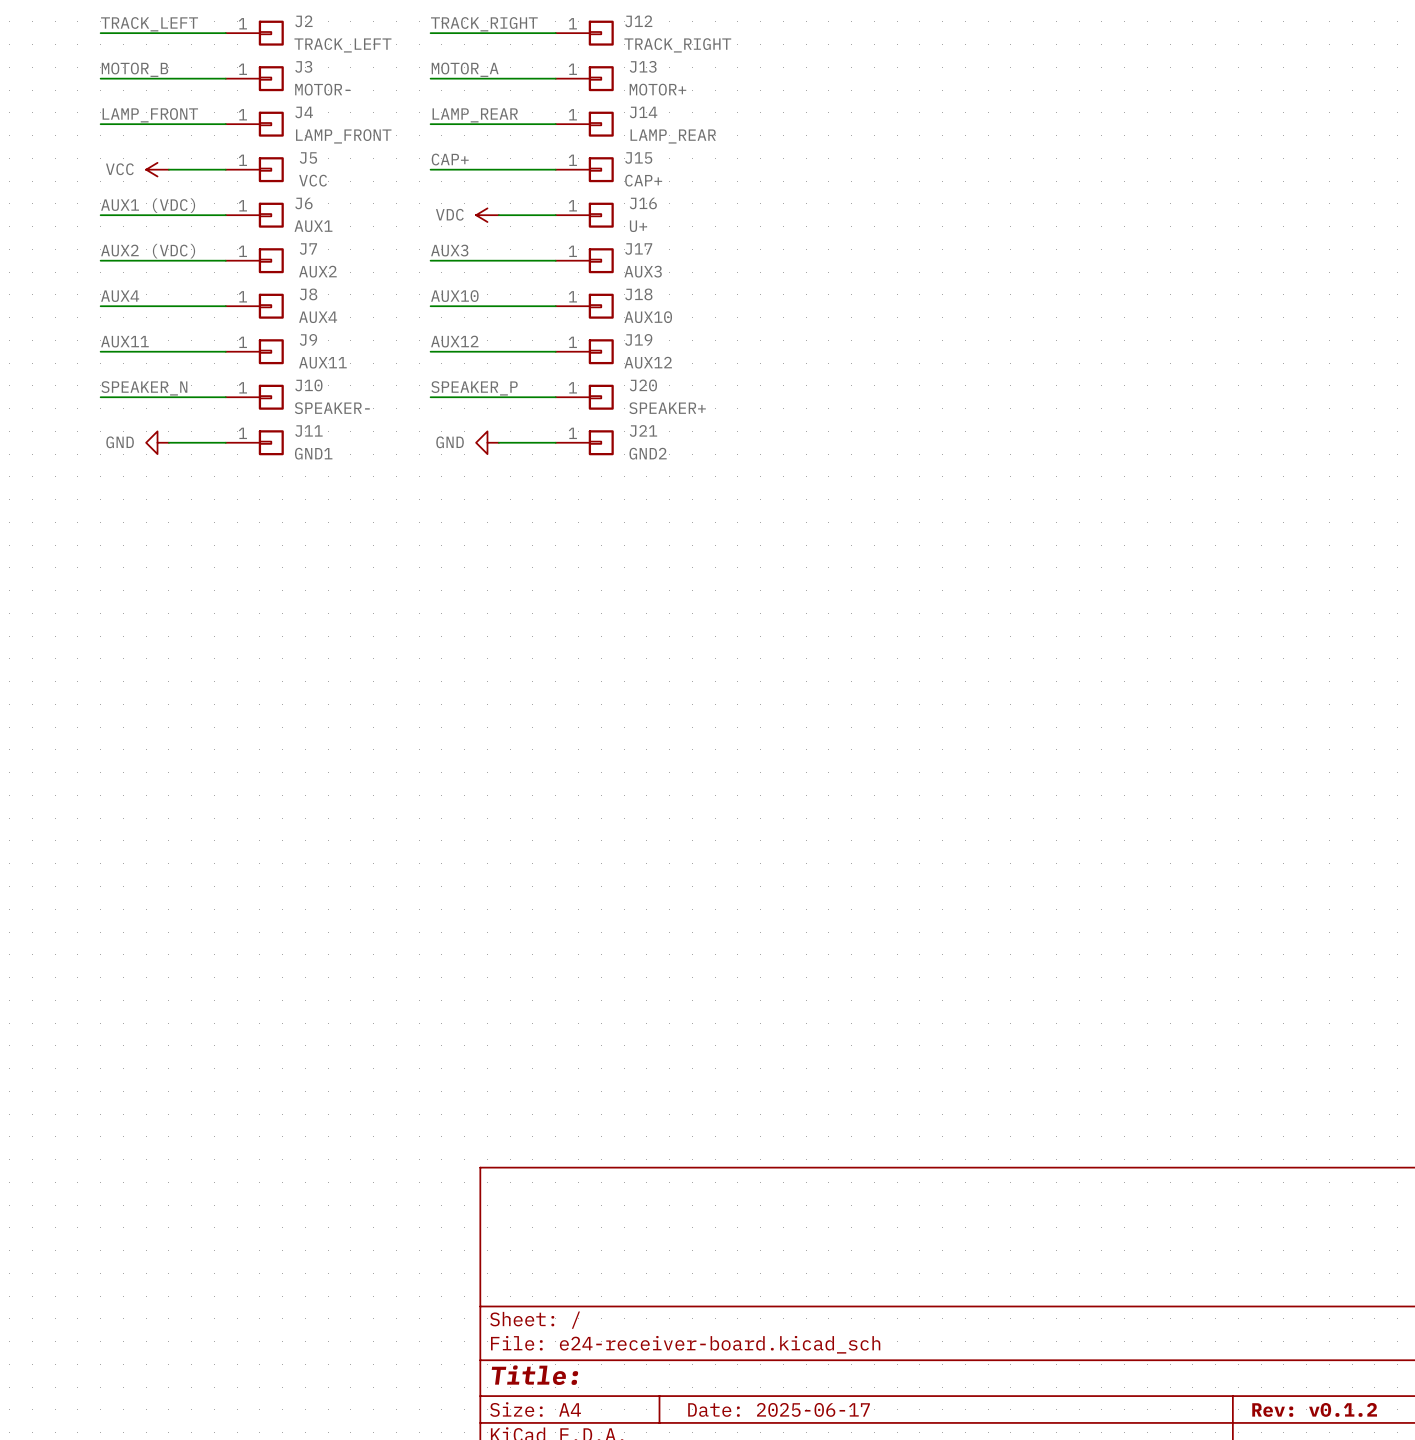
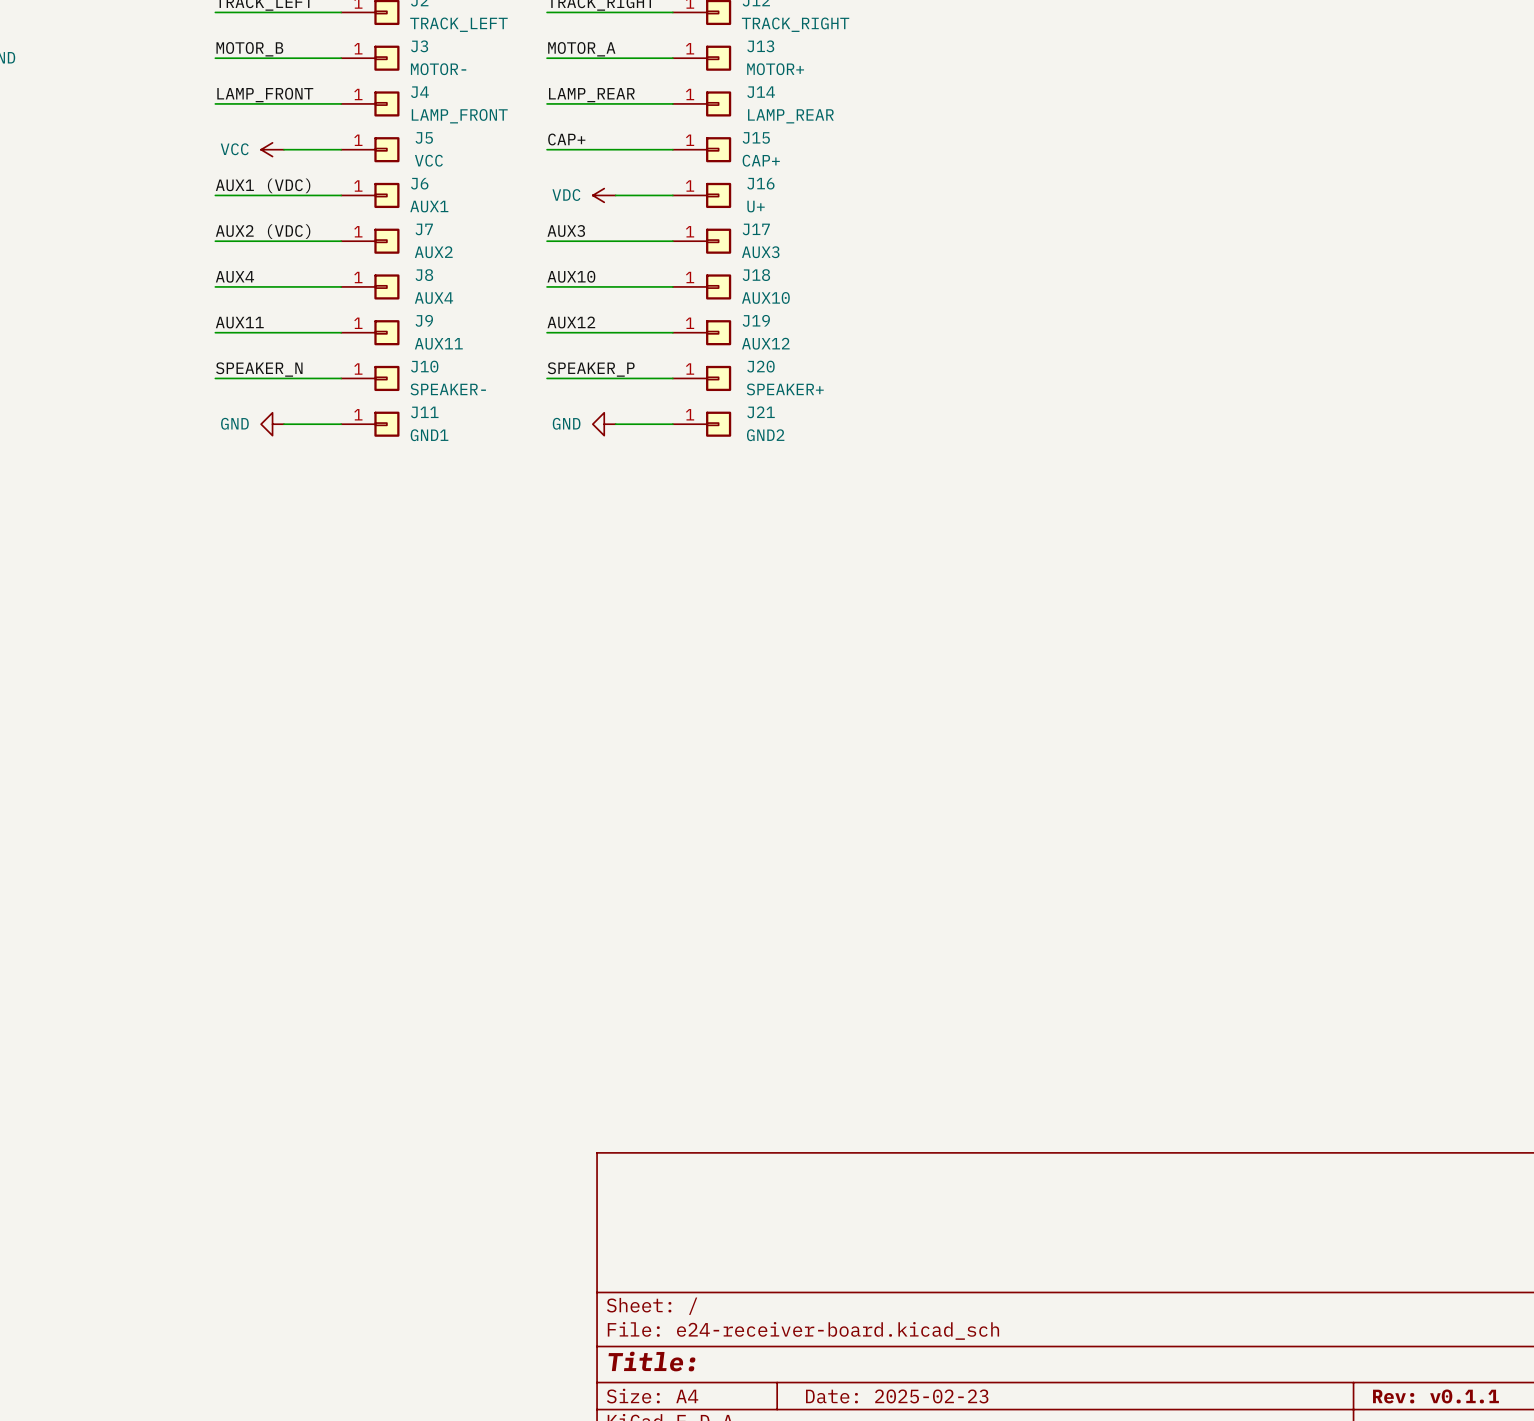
title block: Date: 2025-06-17 (779, 1409) -> Date: 2025-02-23 (897, 1396)
title block: Rev: v0.1.2 (1314, 1409) -> Rev: v0.1.1 (1435, 1396)

